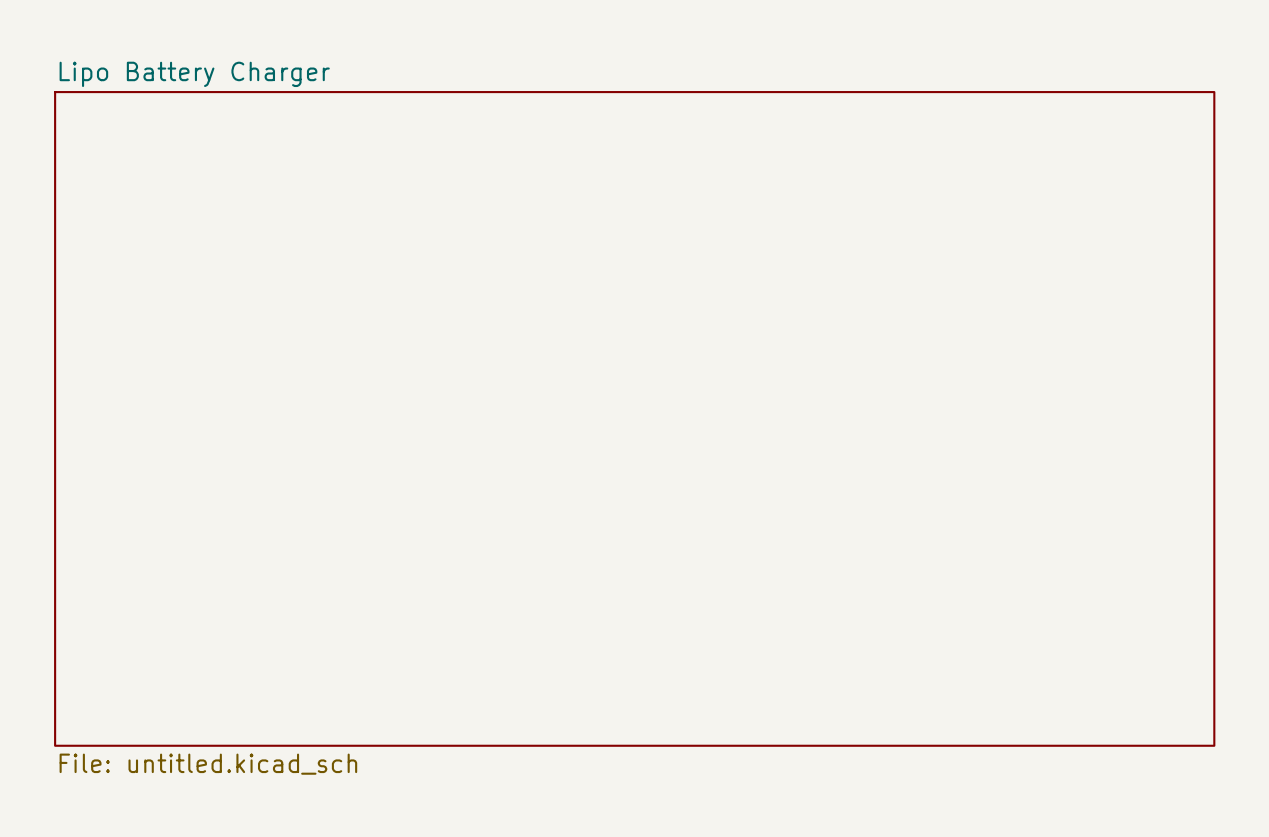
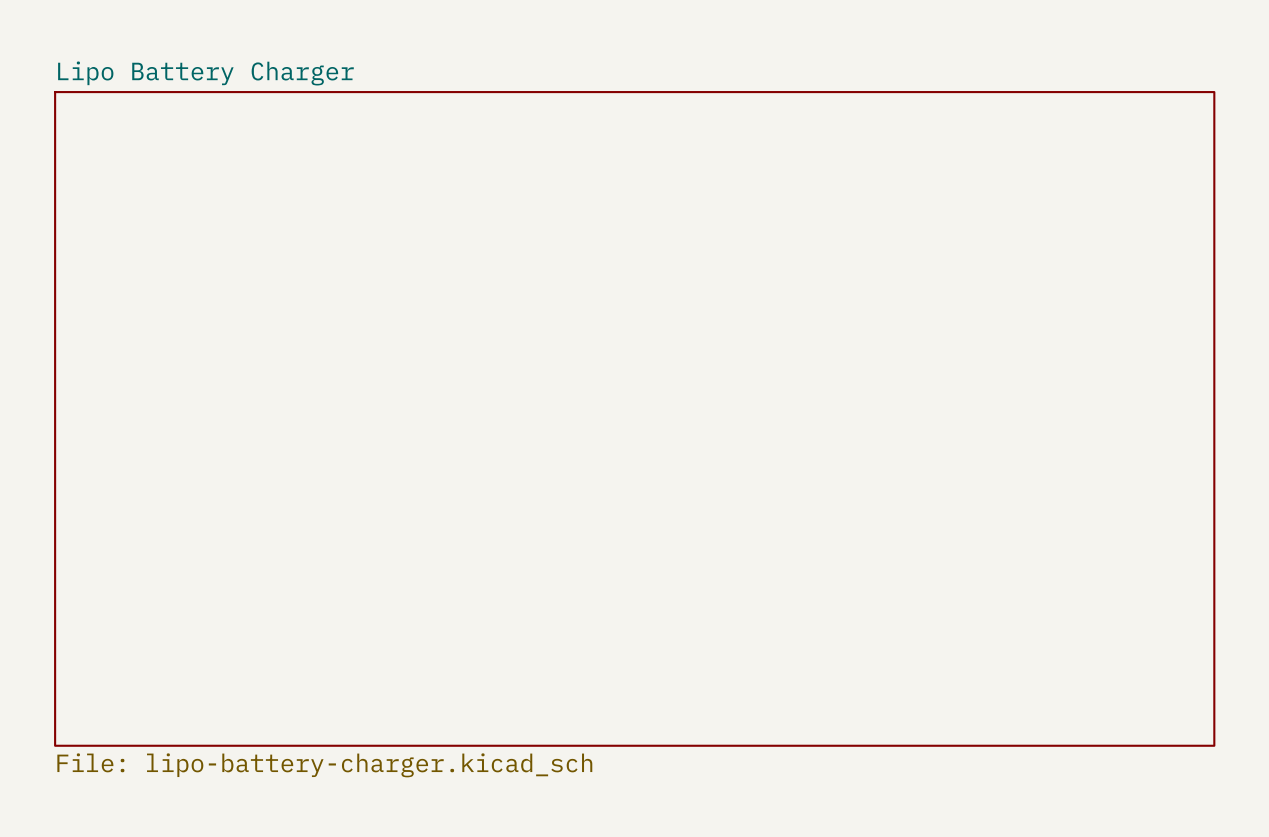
sheet Lipo Battery Charger value: File: untitled.kicad_sch (208, 764) -> File: lipo-battery-charger.kicad_sch (324, 765)

